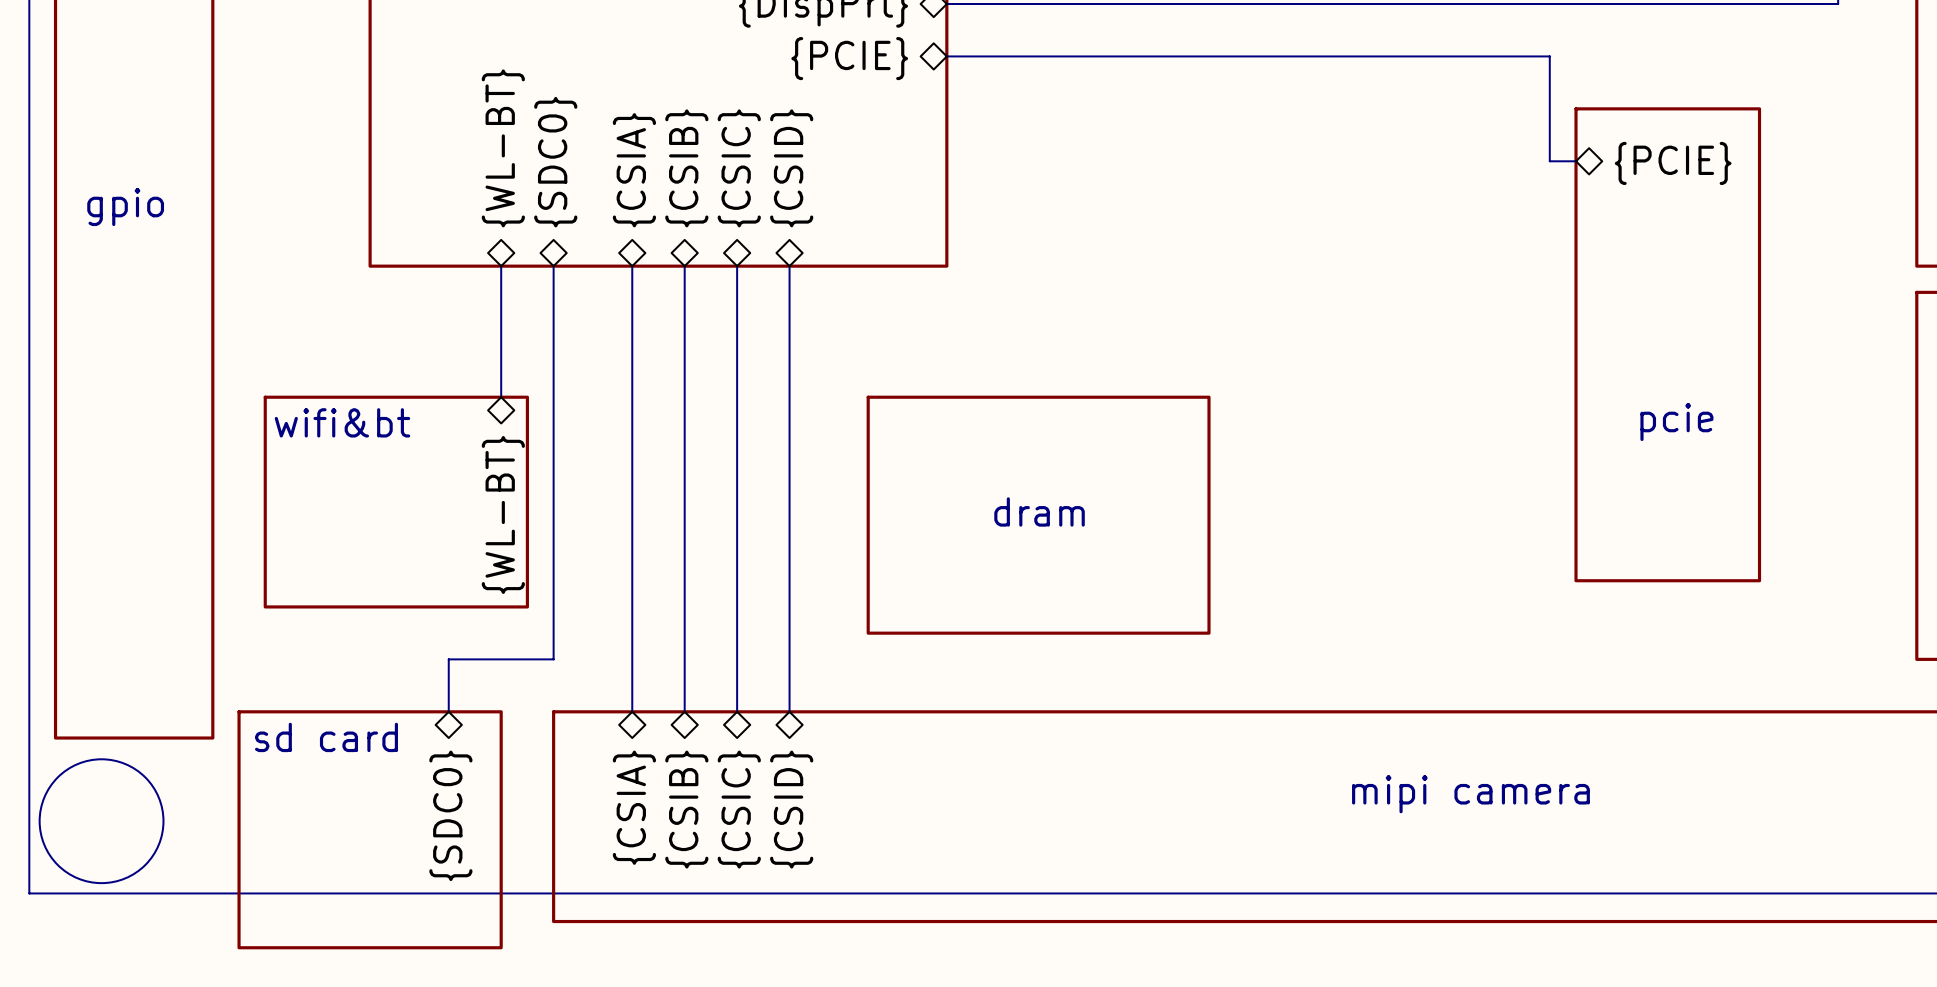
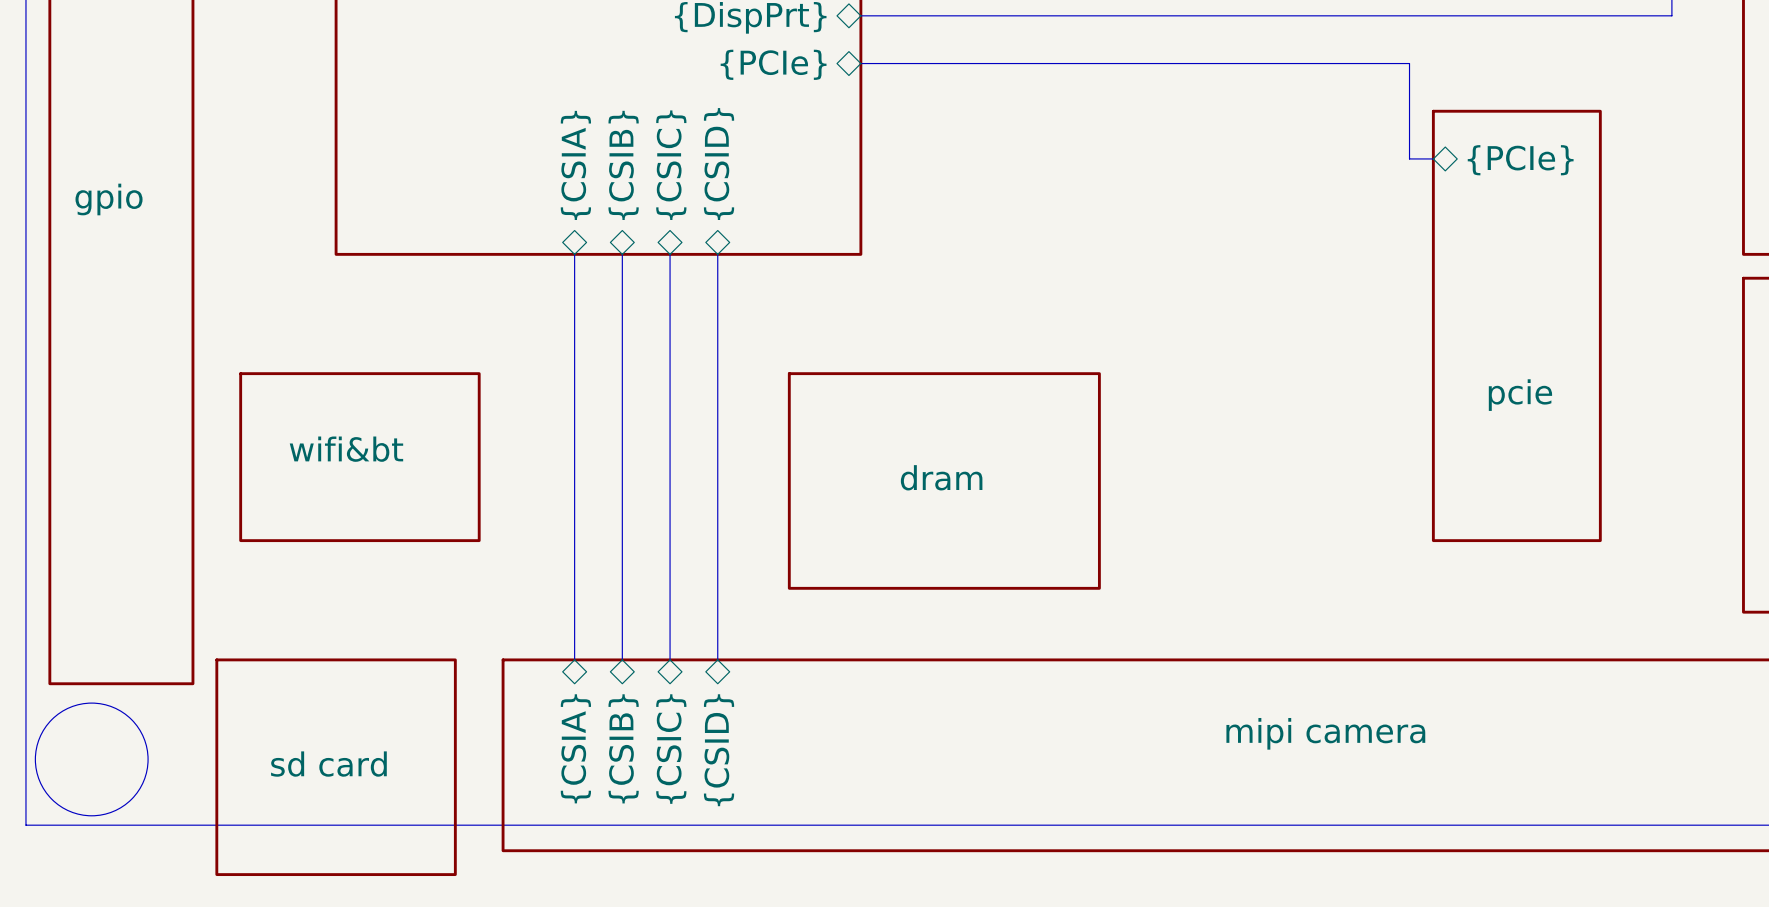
sheet pin: {PCIE} (849, 58) -> {PCIe} (773, 64)
sheet pin: {WL-BT} (503, 148) -> none
sheet pin: {SDC0} (555, 162) -> none
sheet pin: {PCIE} (1673, 163) -> {PCIe} (1520, 160)
bus: (501, 266) (501, 397) -> none
bus: (553, 266) (553, 659) (448, 659) (448, 711) -> none
sheet wifi&bt shape: [263, 395, 529, 609] -> [239, 372, 481, 543]
sheet wifi&bt name position: wifi&bt (342, 422) -> wifi&bt (346, 449)
sheet pin: {WL-BT} (503, 514) -> none
sheet sd card name position: sd card (326, 737) -> sd card (328, 764)
sheet pin: {SDC0} (450, 815) -> none

